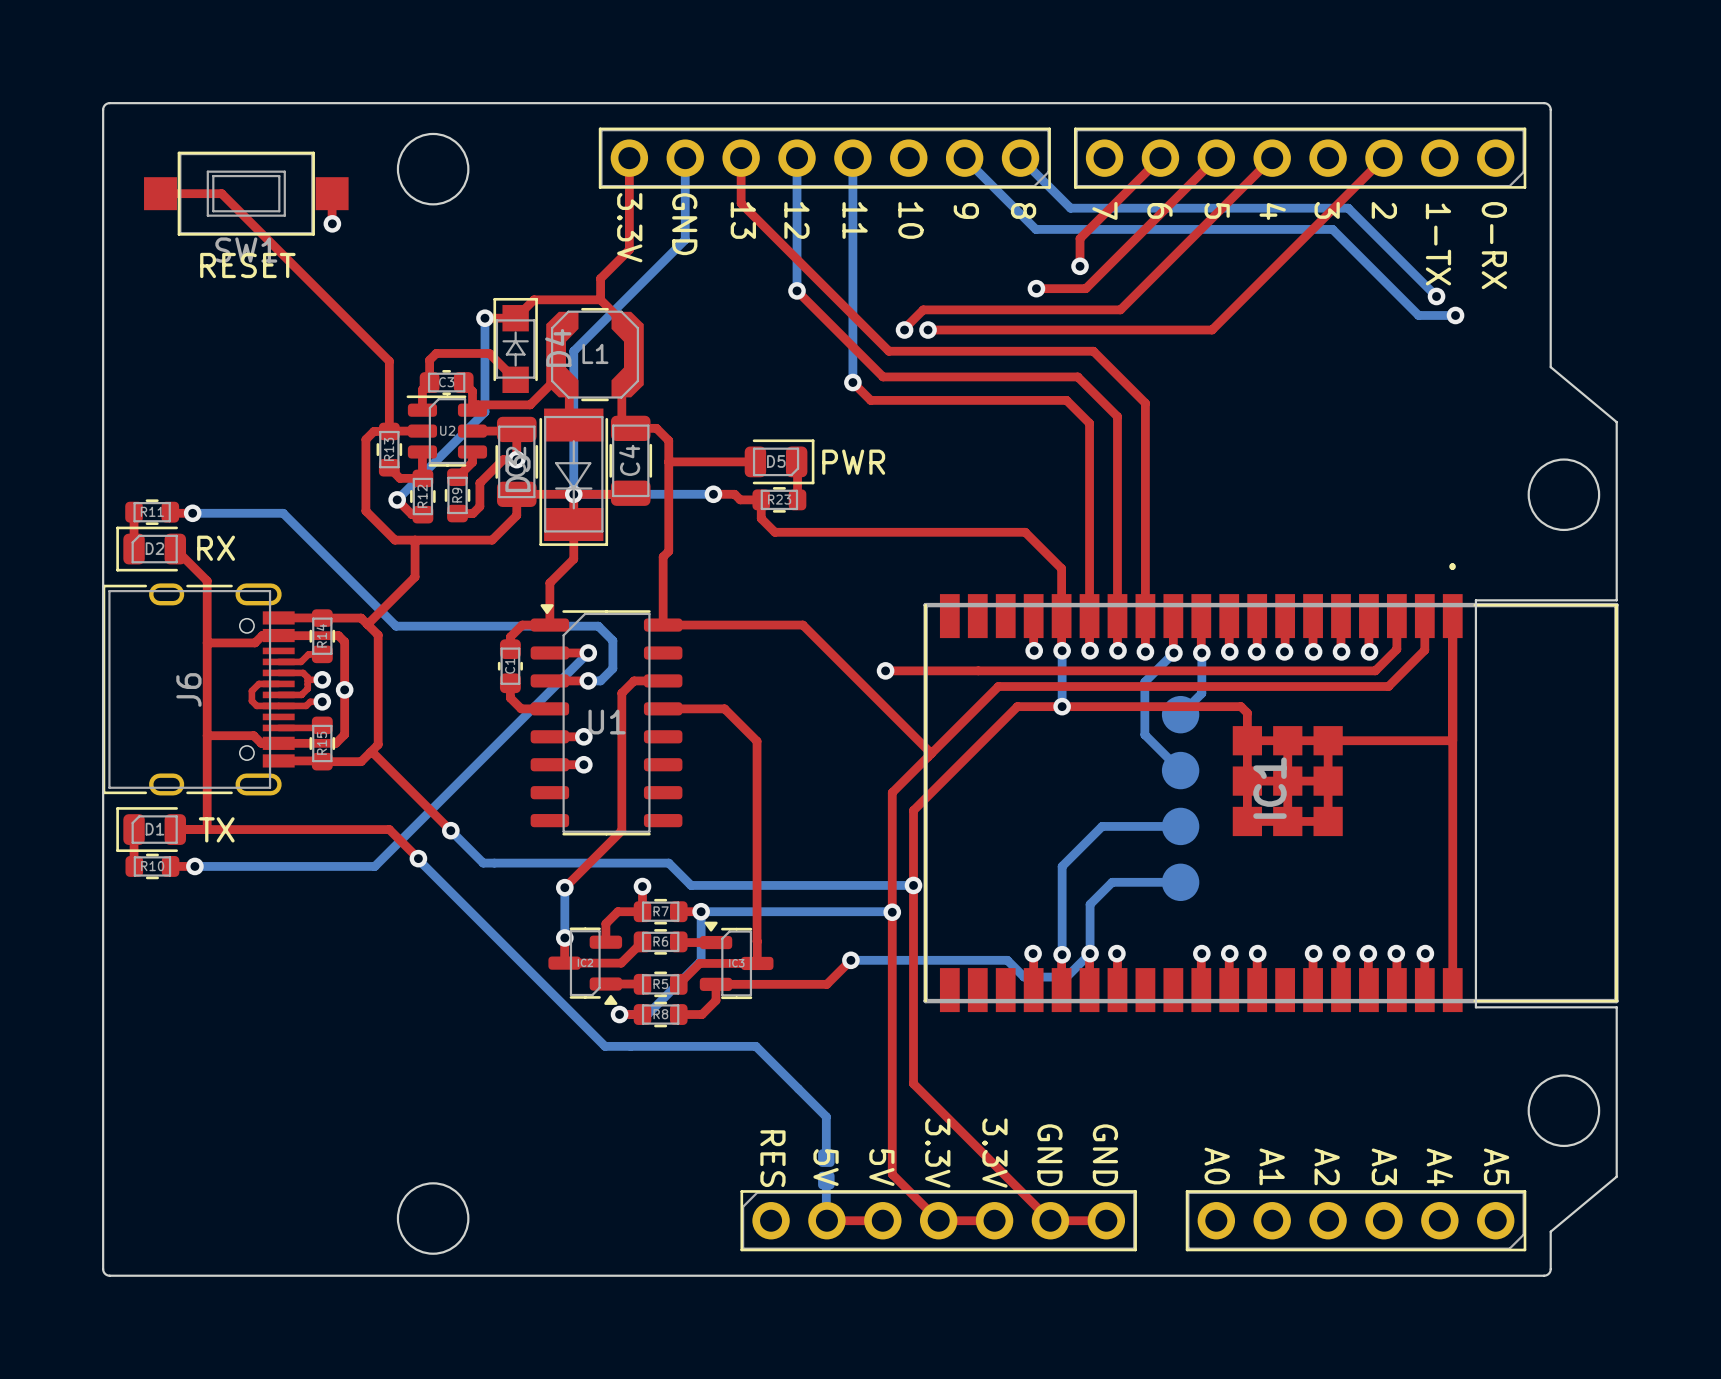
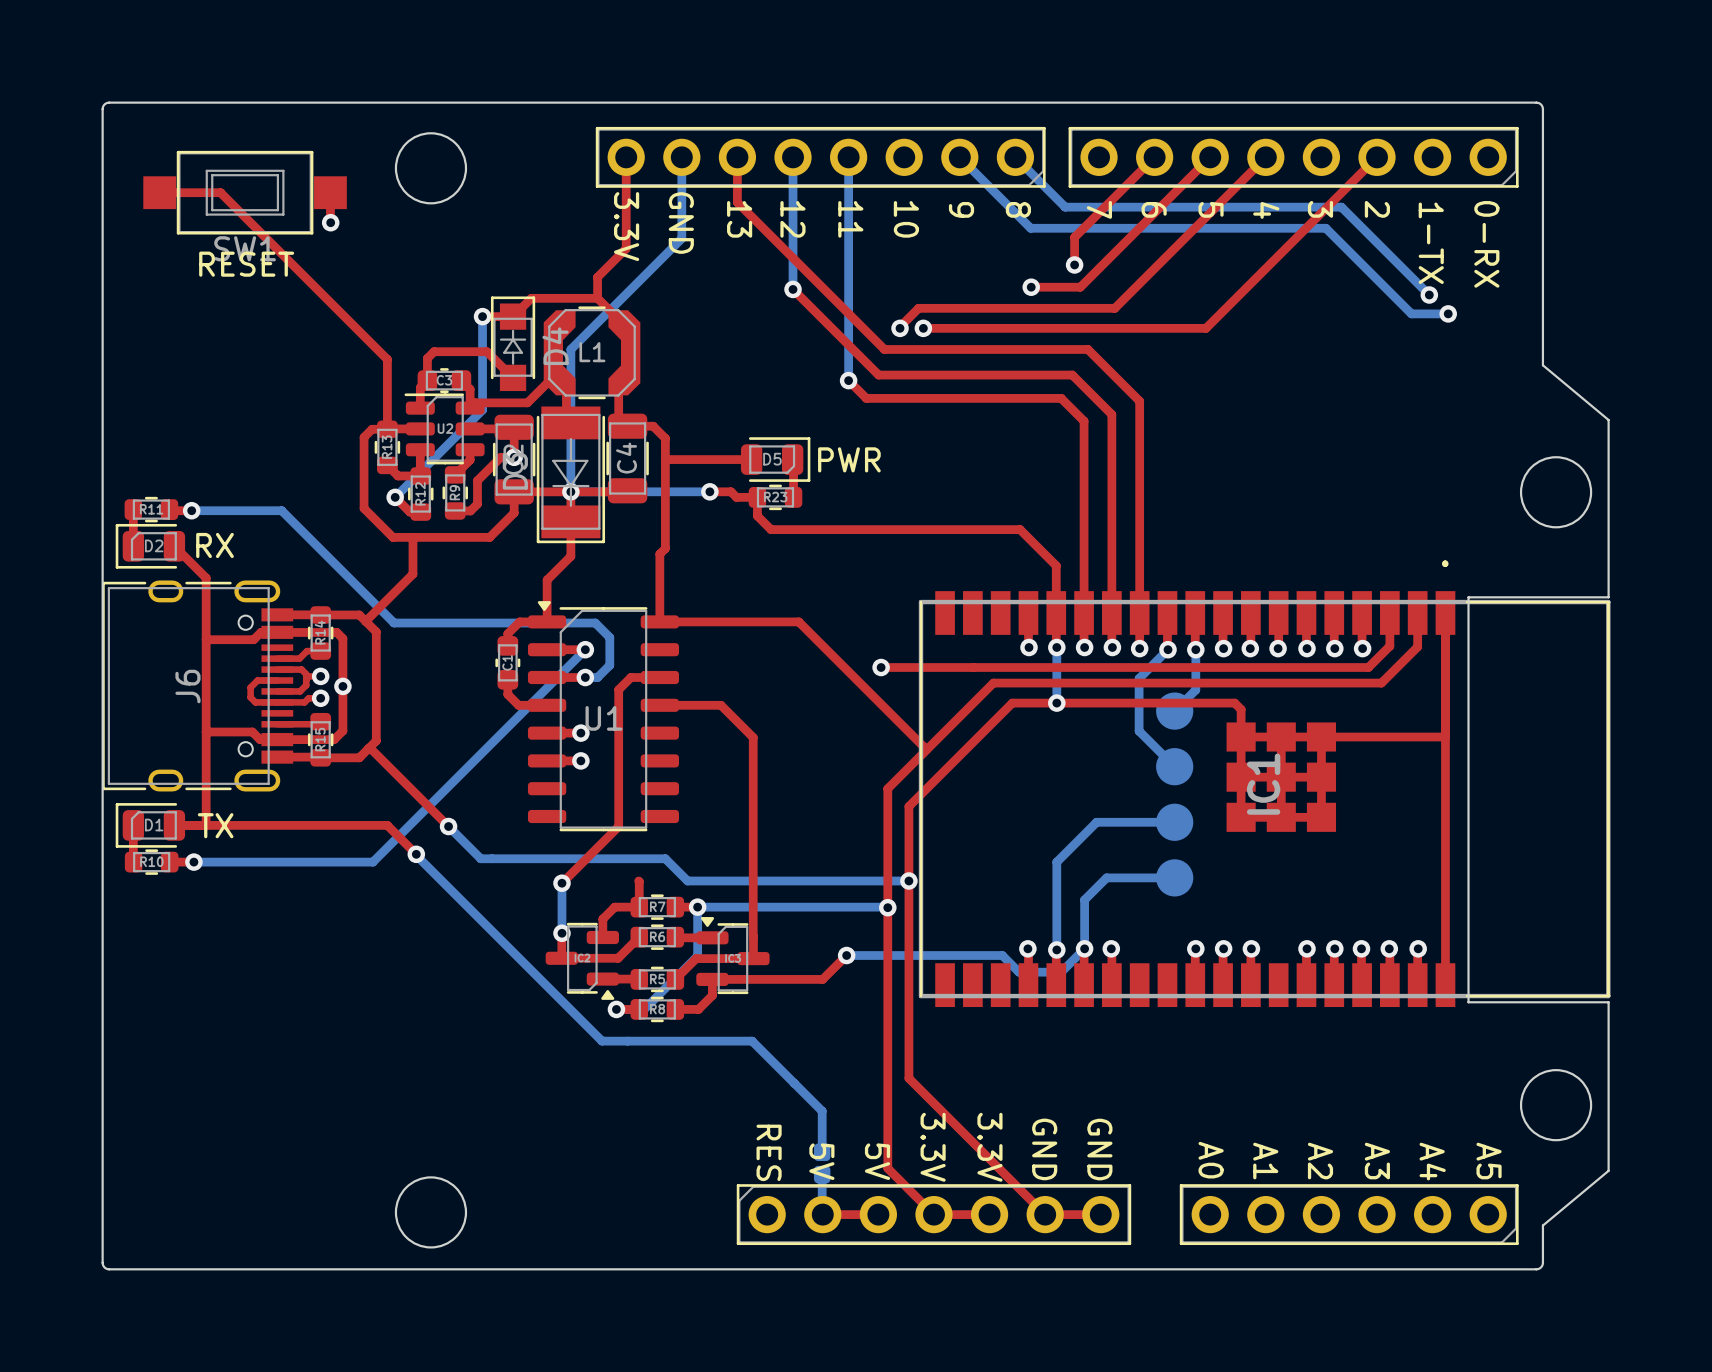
via: (642, 886) -> none

